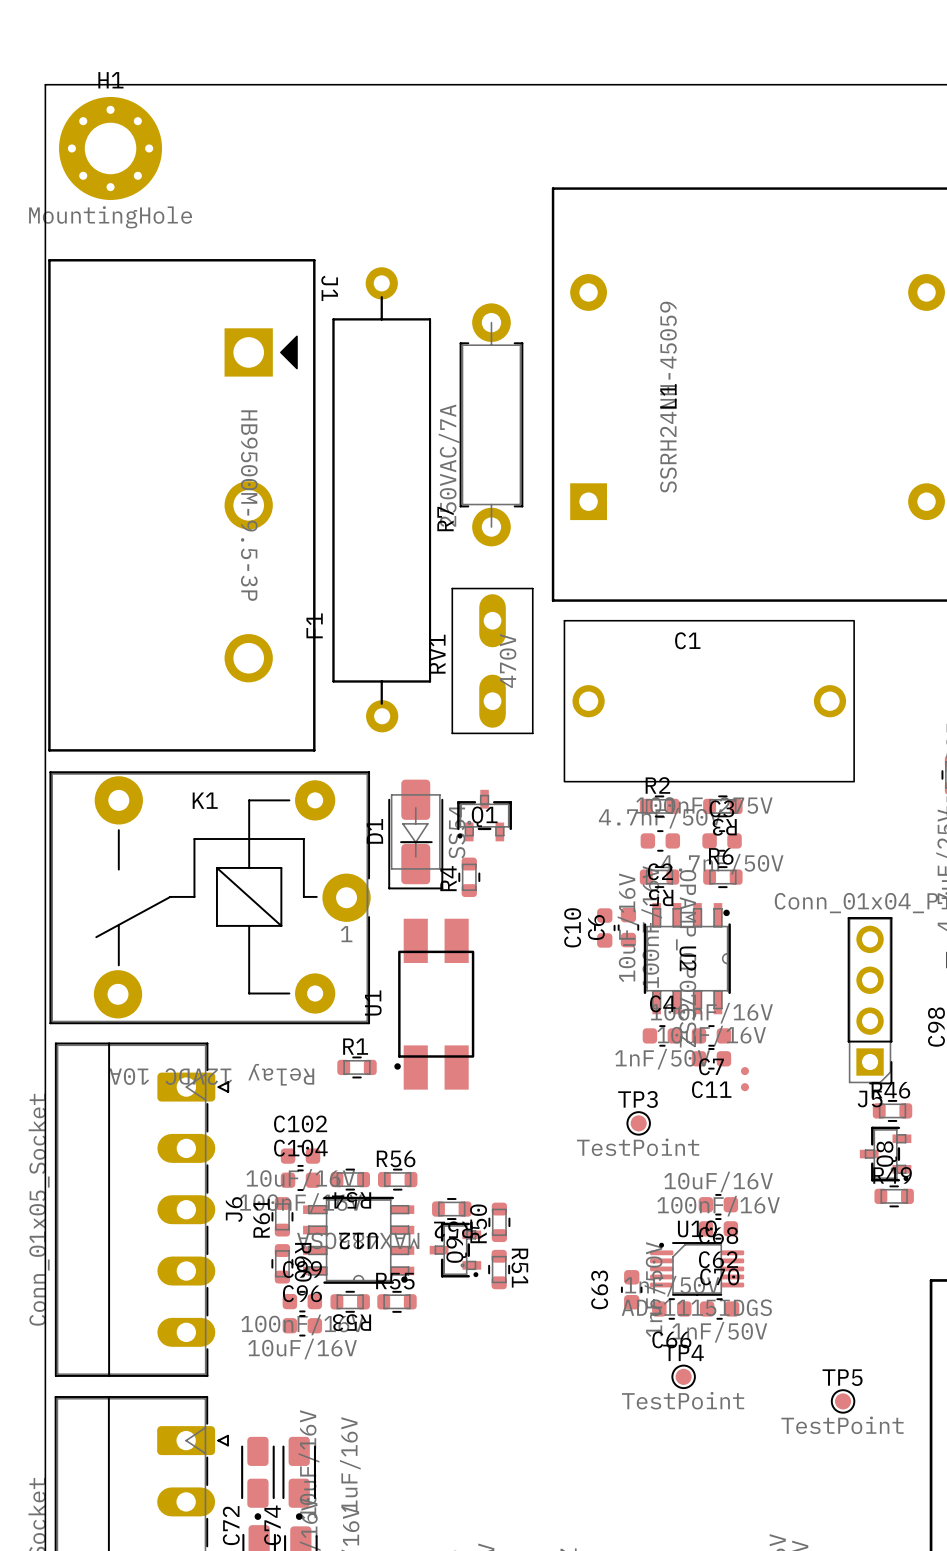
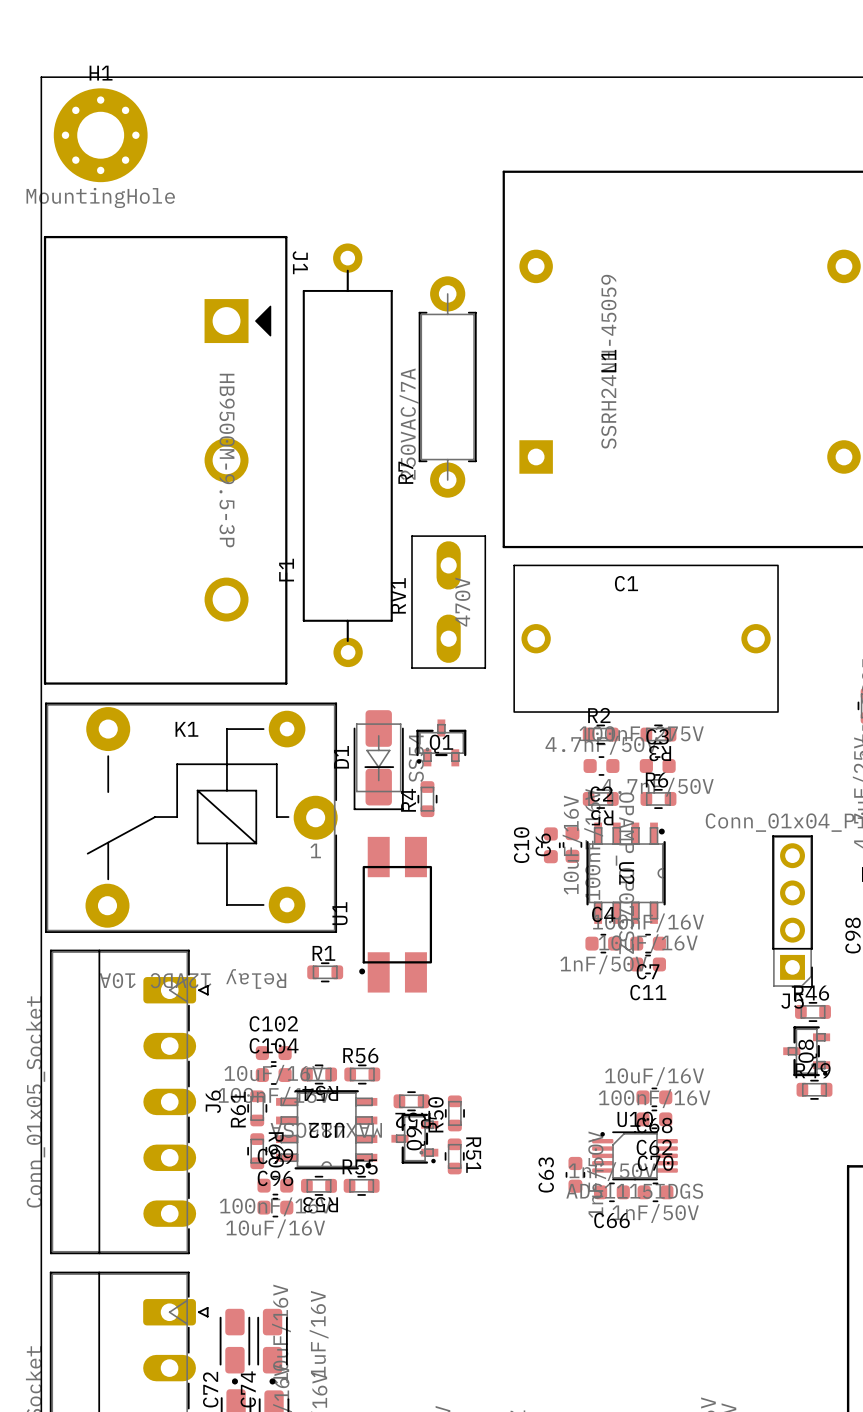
part: (744, 1079) -> none
TP3: TestPoint (638, 1123) -> none
TP4: TestPoint (683, 1376) -> none
TP5: TestPoint (843, 1401) -> none

